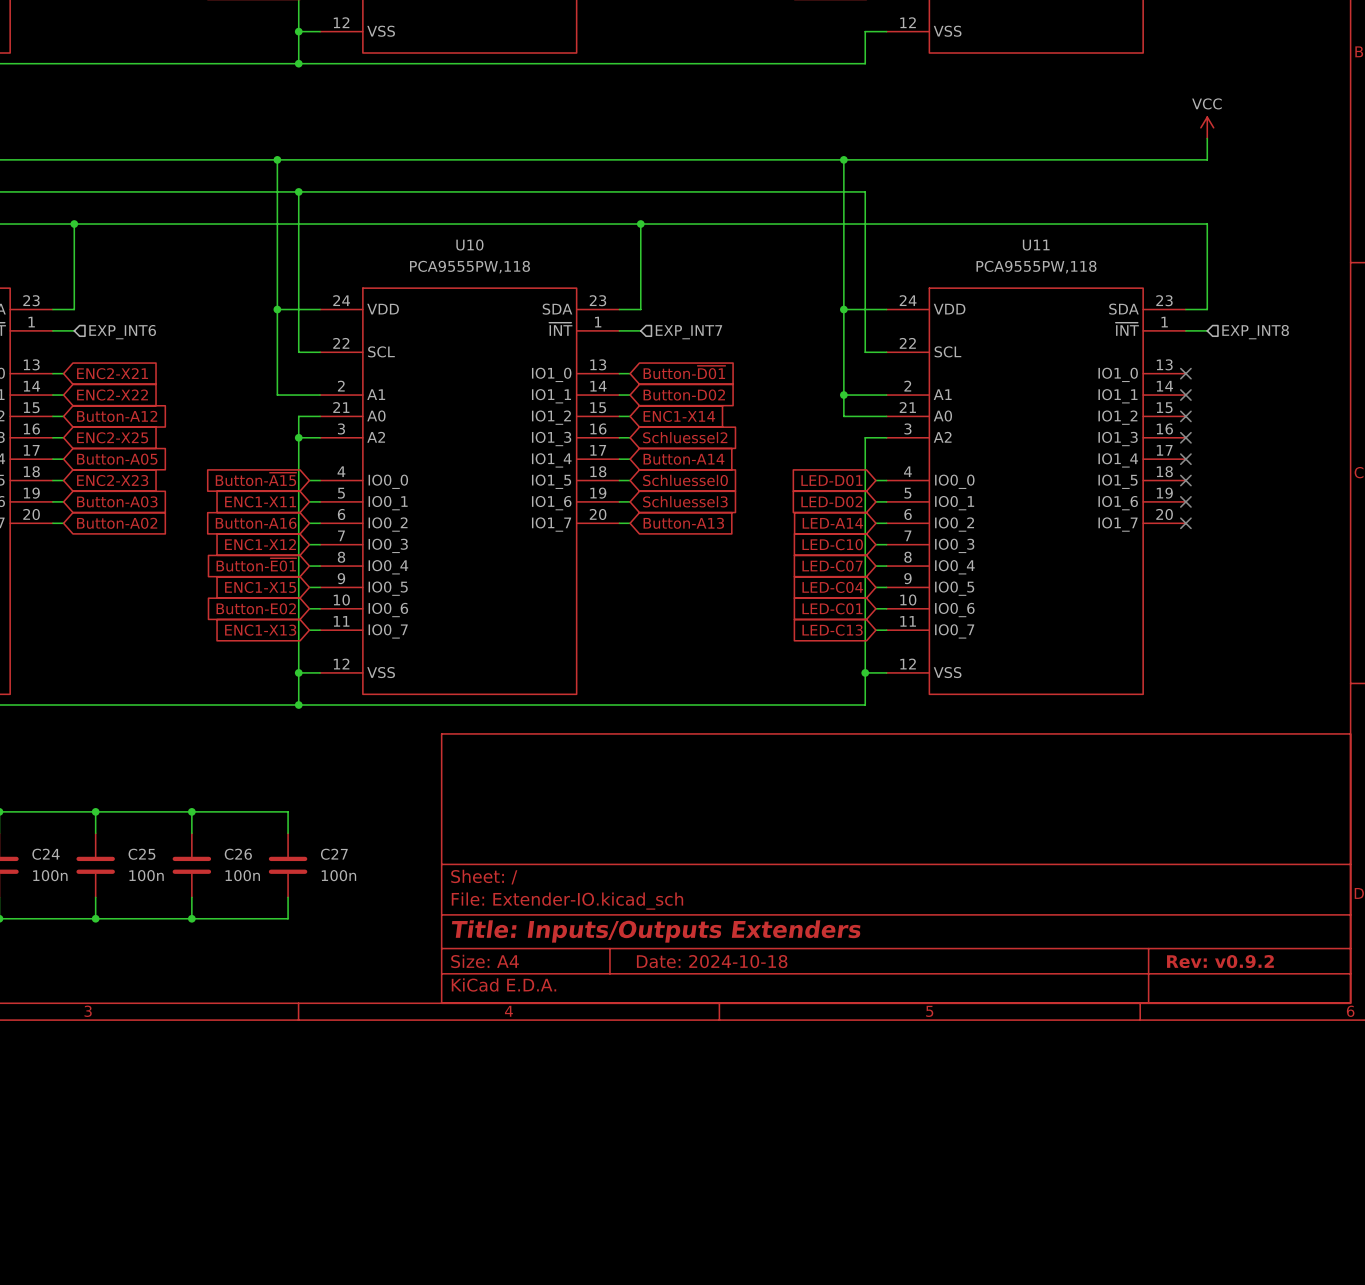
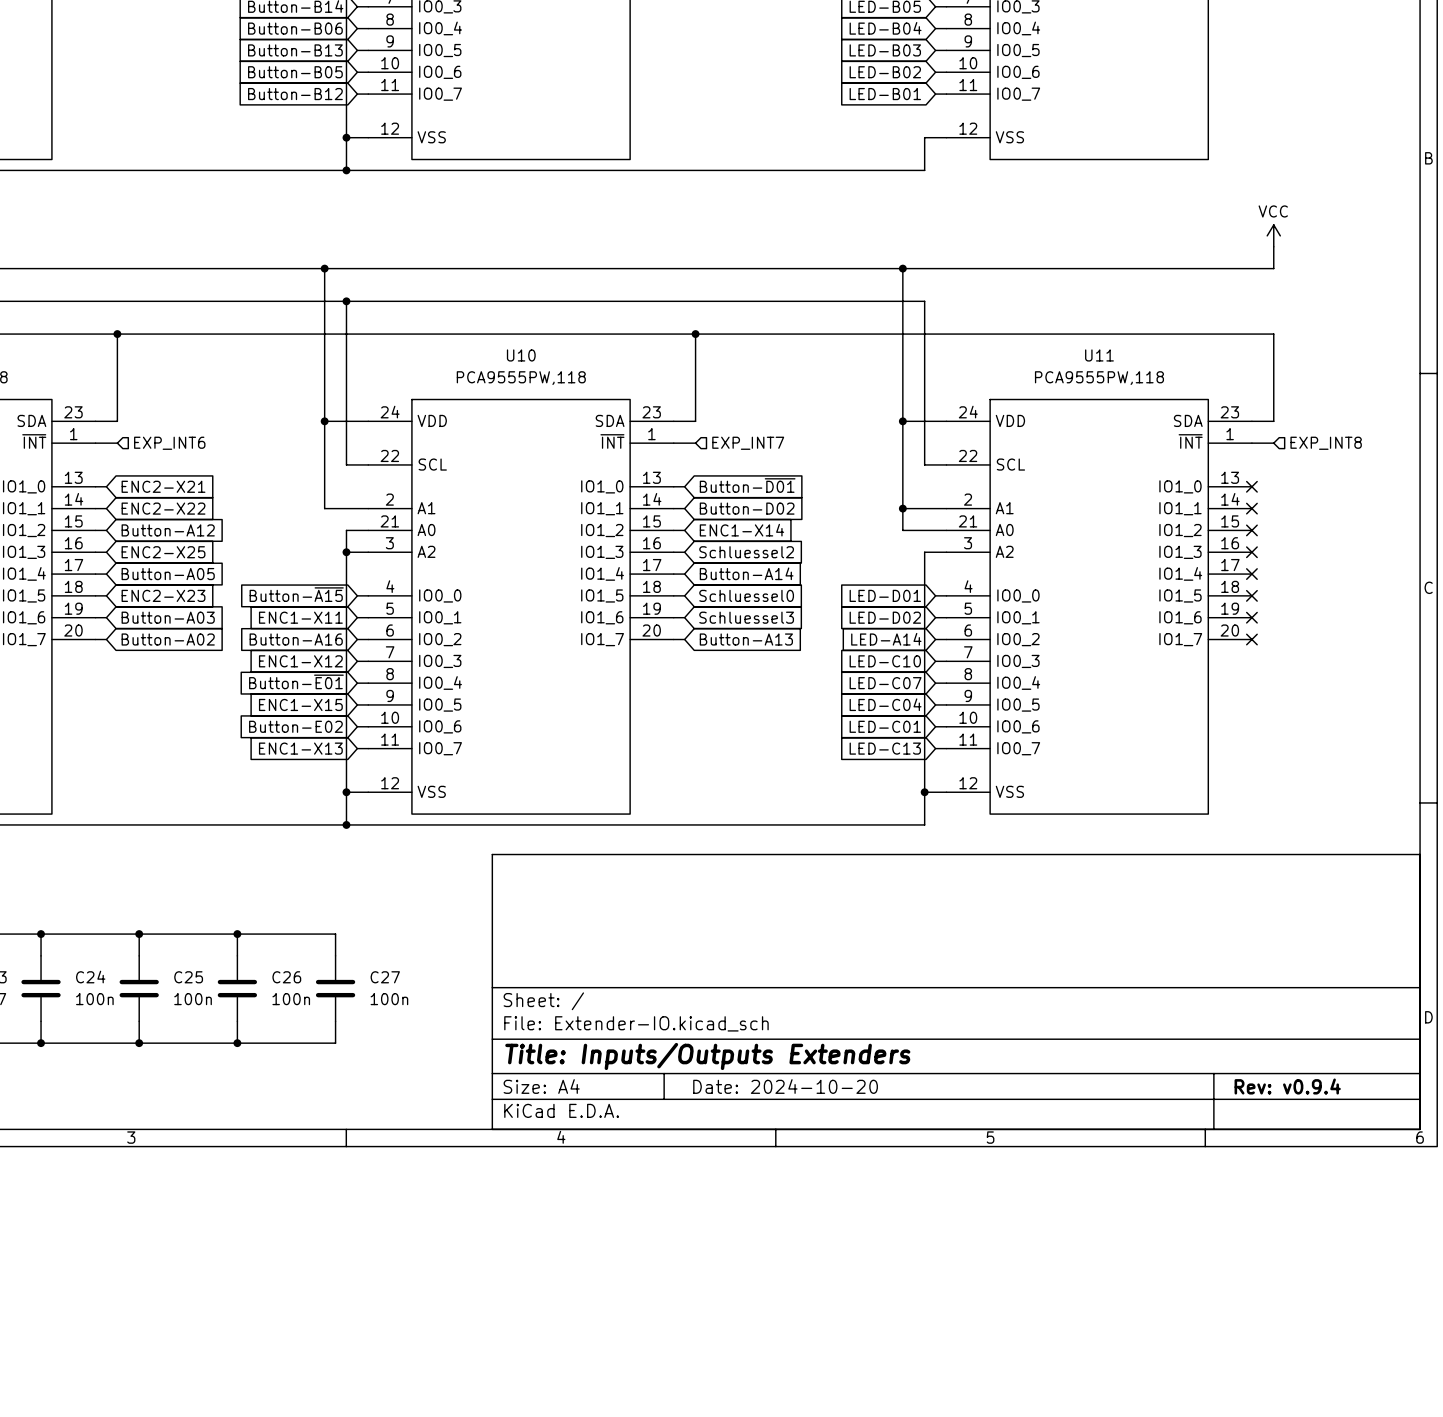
title block: Date: 2024-10-18 (712, 961) -> Date: 2024-10-20 (785, 1086)
title block: Rev: v0.9.2 (1220, 961) -> Rev: v0.9.4 (1287, 1086)

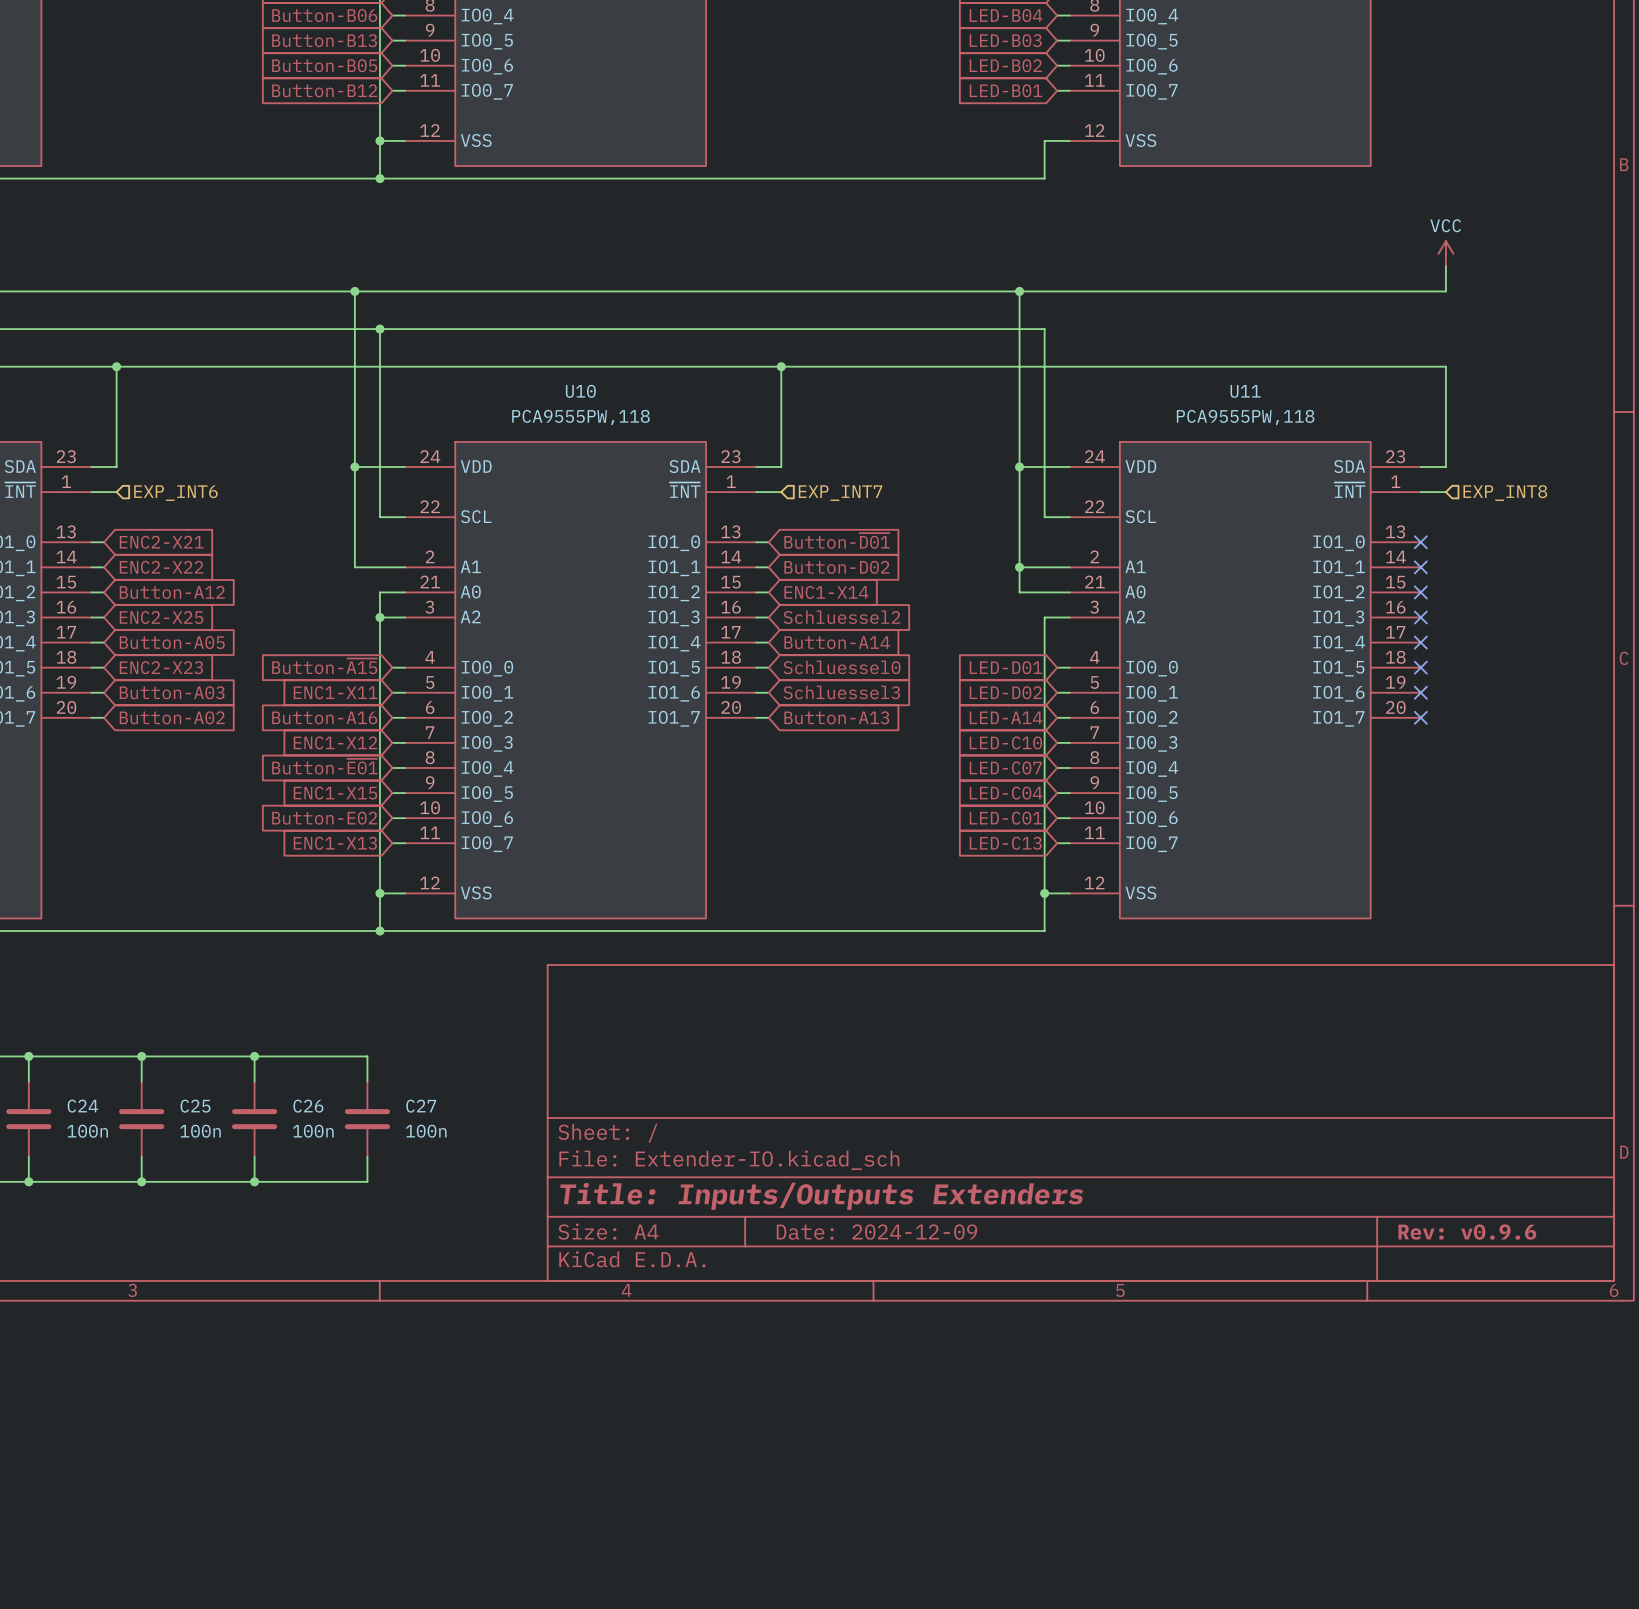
title block: Date: 2024-10-20 (785, 1086) -> Date: 2024-12-09 (876, 1232)
title block: Rev: v0.9.4 (1287, 1086) -> Rev: v0.9.6 (1467, 1232)

